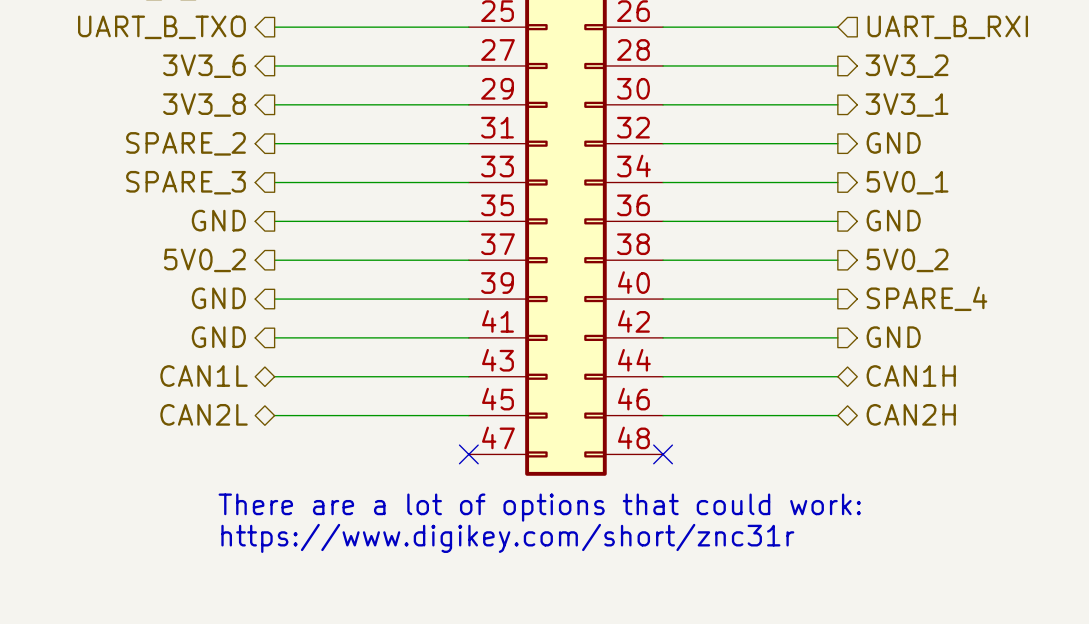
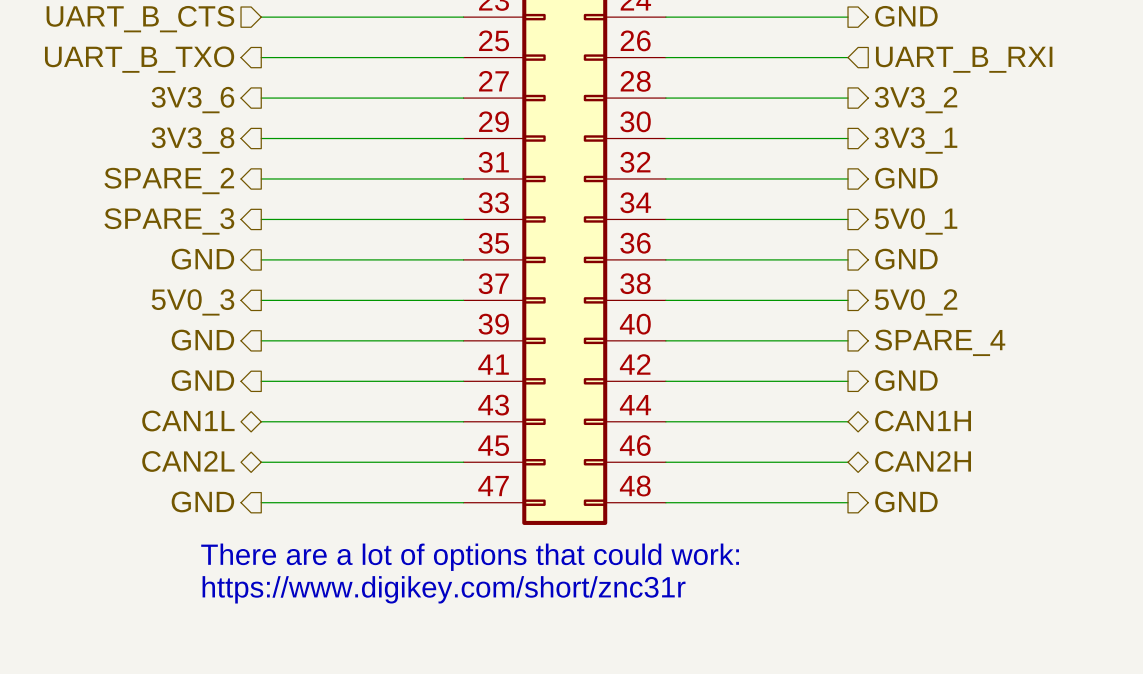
hierarchical label: 5V0_2 (204, 260) -> 5V0_3 (192, 302)
hierarchical label: none -> GND (202, 501)
hierarchical label: none -> GND (906, 501)
wire: none -> (261, 502) (463, 502)
no-connect mark: (468, 454) -> none
wire: none -> (665, 502) (848, 502)
no-connect mark: (663, 454) -> none

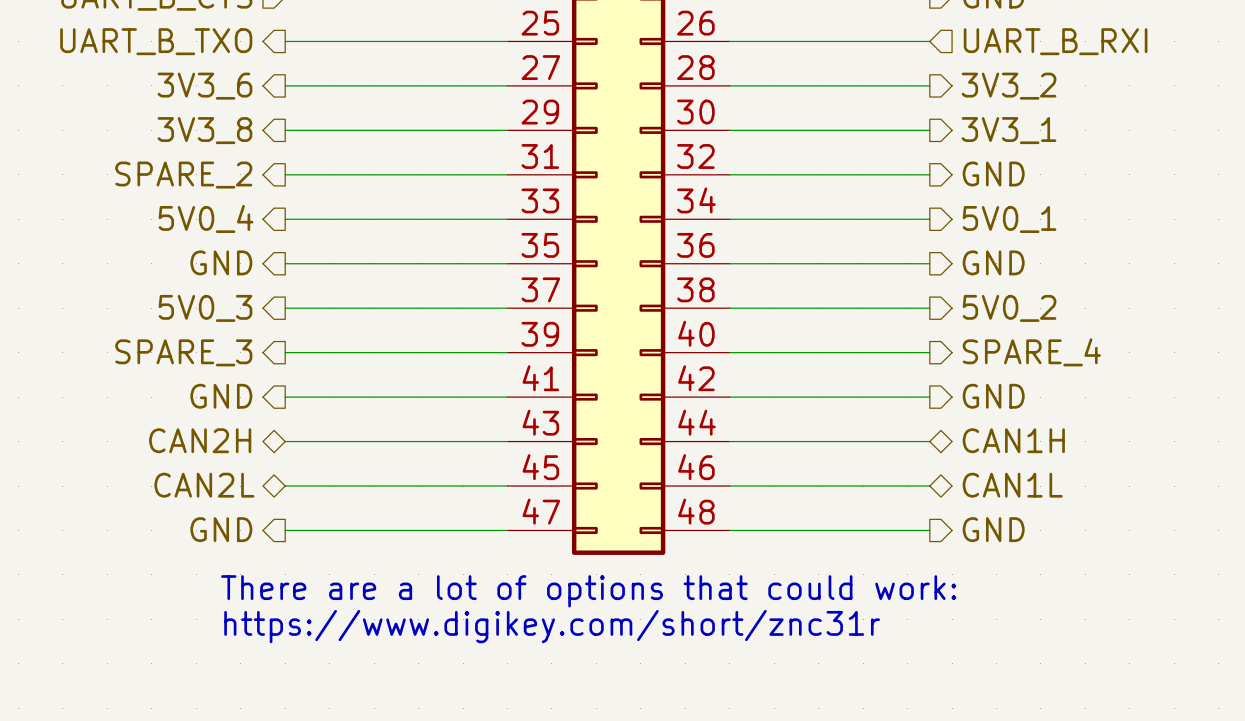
hierarchical label: SPARE_3 (169, 221) -> 5V0_4 (206, 218)
hierarchical label: GND (202, 340) -> SPARE_3 (183, 352)
hierarchical label: CAN1L (188, 421) -> CAN2H (200, 440)
hierarchical label: CAN2H (923, 461) -> CAN1L (1012, 485)

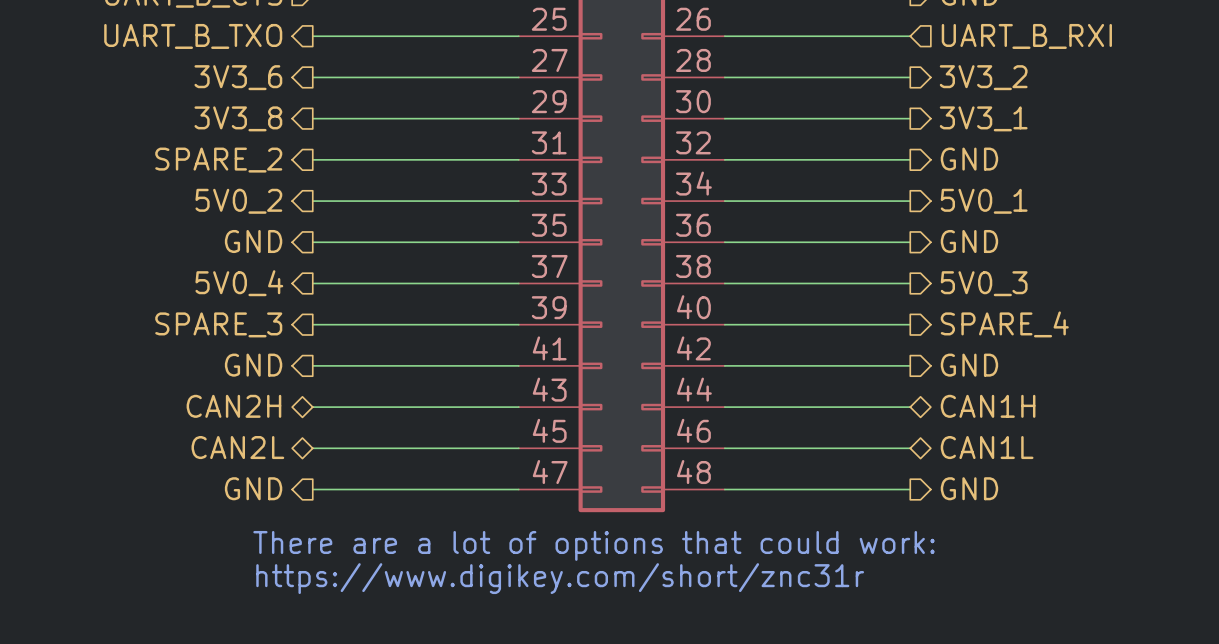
hierarchical label: 5V0_4 (206, 218) -> 5V0_2 (238, 201)
hierarchical label: 5V0_3 (205, 308) -> 5V0_4 (239, 283)
hierarchical label: 5V0_2 (1009, 308) -> 5V0_3 (984, 283)

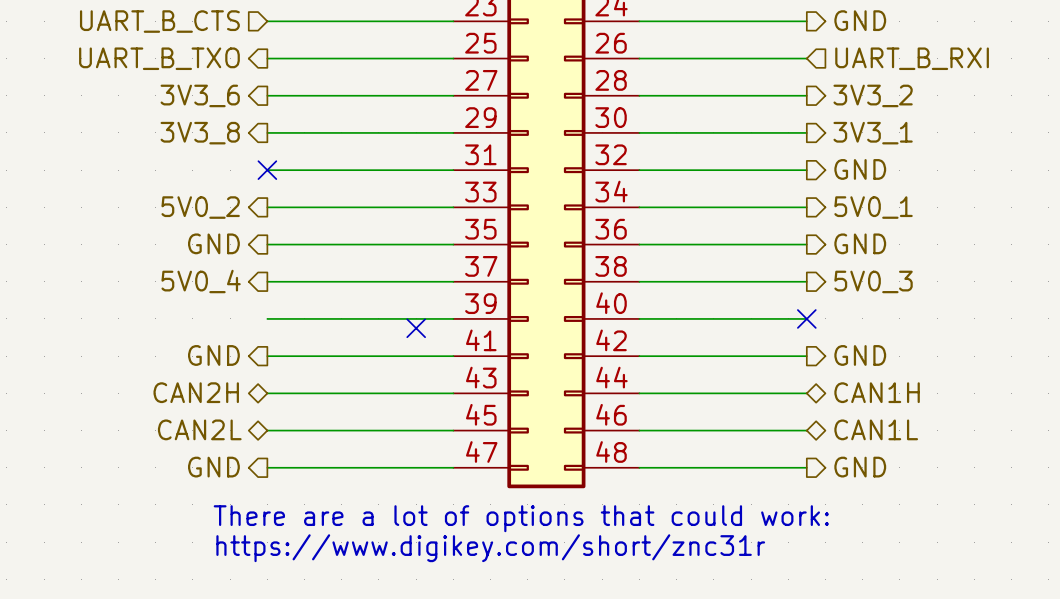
no-connect mark: none -> (267, 170)
hierarchical label: SPARE_2 (218, 160) -> none
hierarchical label: SPARE_3 (218, 324) -> none
no-connect mark: none -> (806, 318)
hierarchical label: SPARE_4 (1004, 324) -> none
no-connect mark: none -> (416, 328)

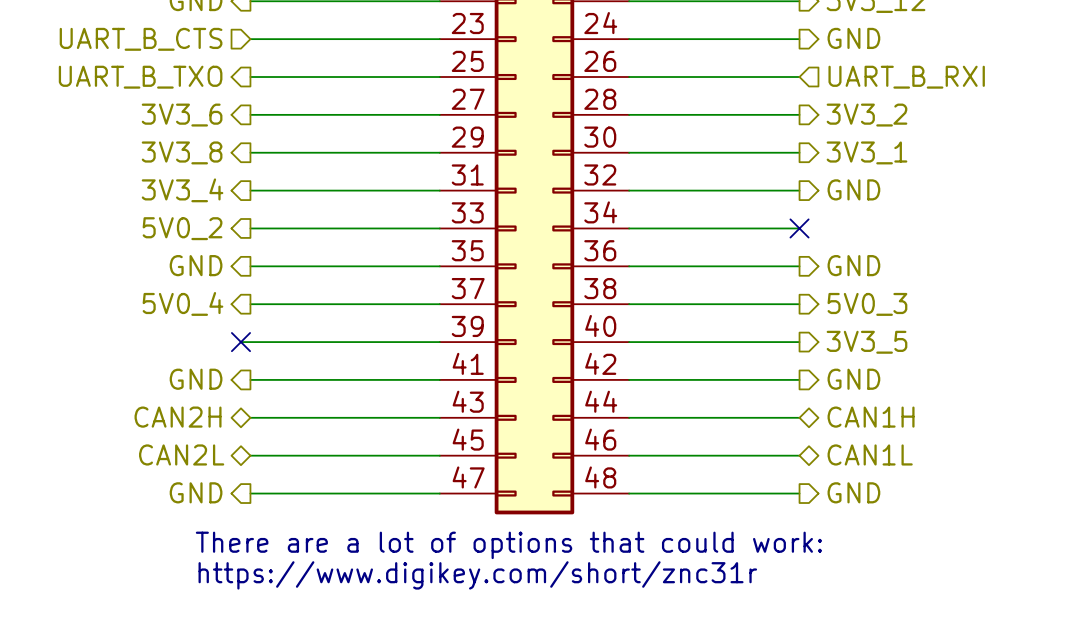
hierarchical label: none -> 3V3_4 (182, 190)
no-connect mark: (267, 170) -> none
no-connect mark: none -> (799, 228)
hierarchical label: 5V0_1 (873, 207) -> none
wire: none -> (240, 342) (250, 342)
no-connect mark: none -> (240, 342)
no-connect mark: (806, 318) -> none
hierarchical label: none -> 3V3_5 (866, 342)
no-connect mark: (416, 328) -> none

